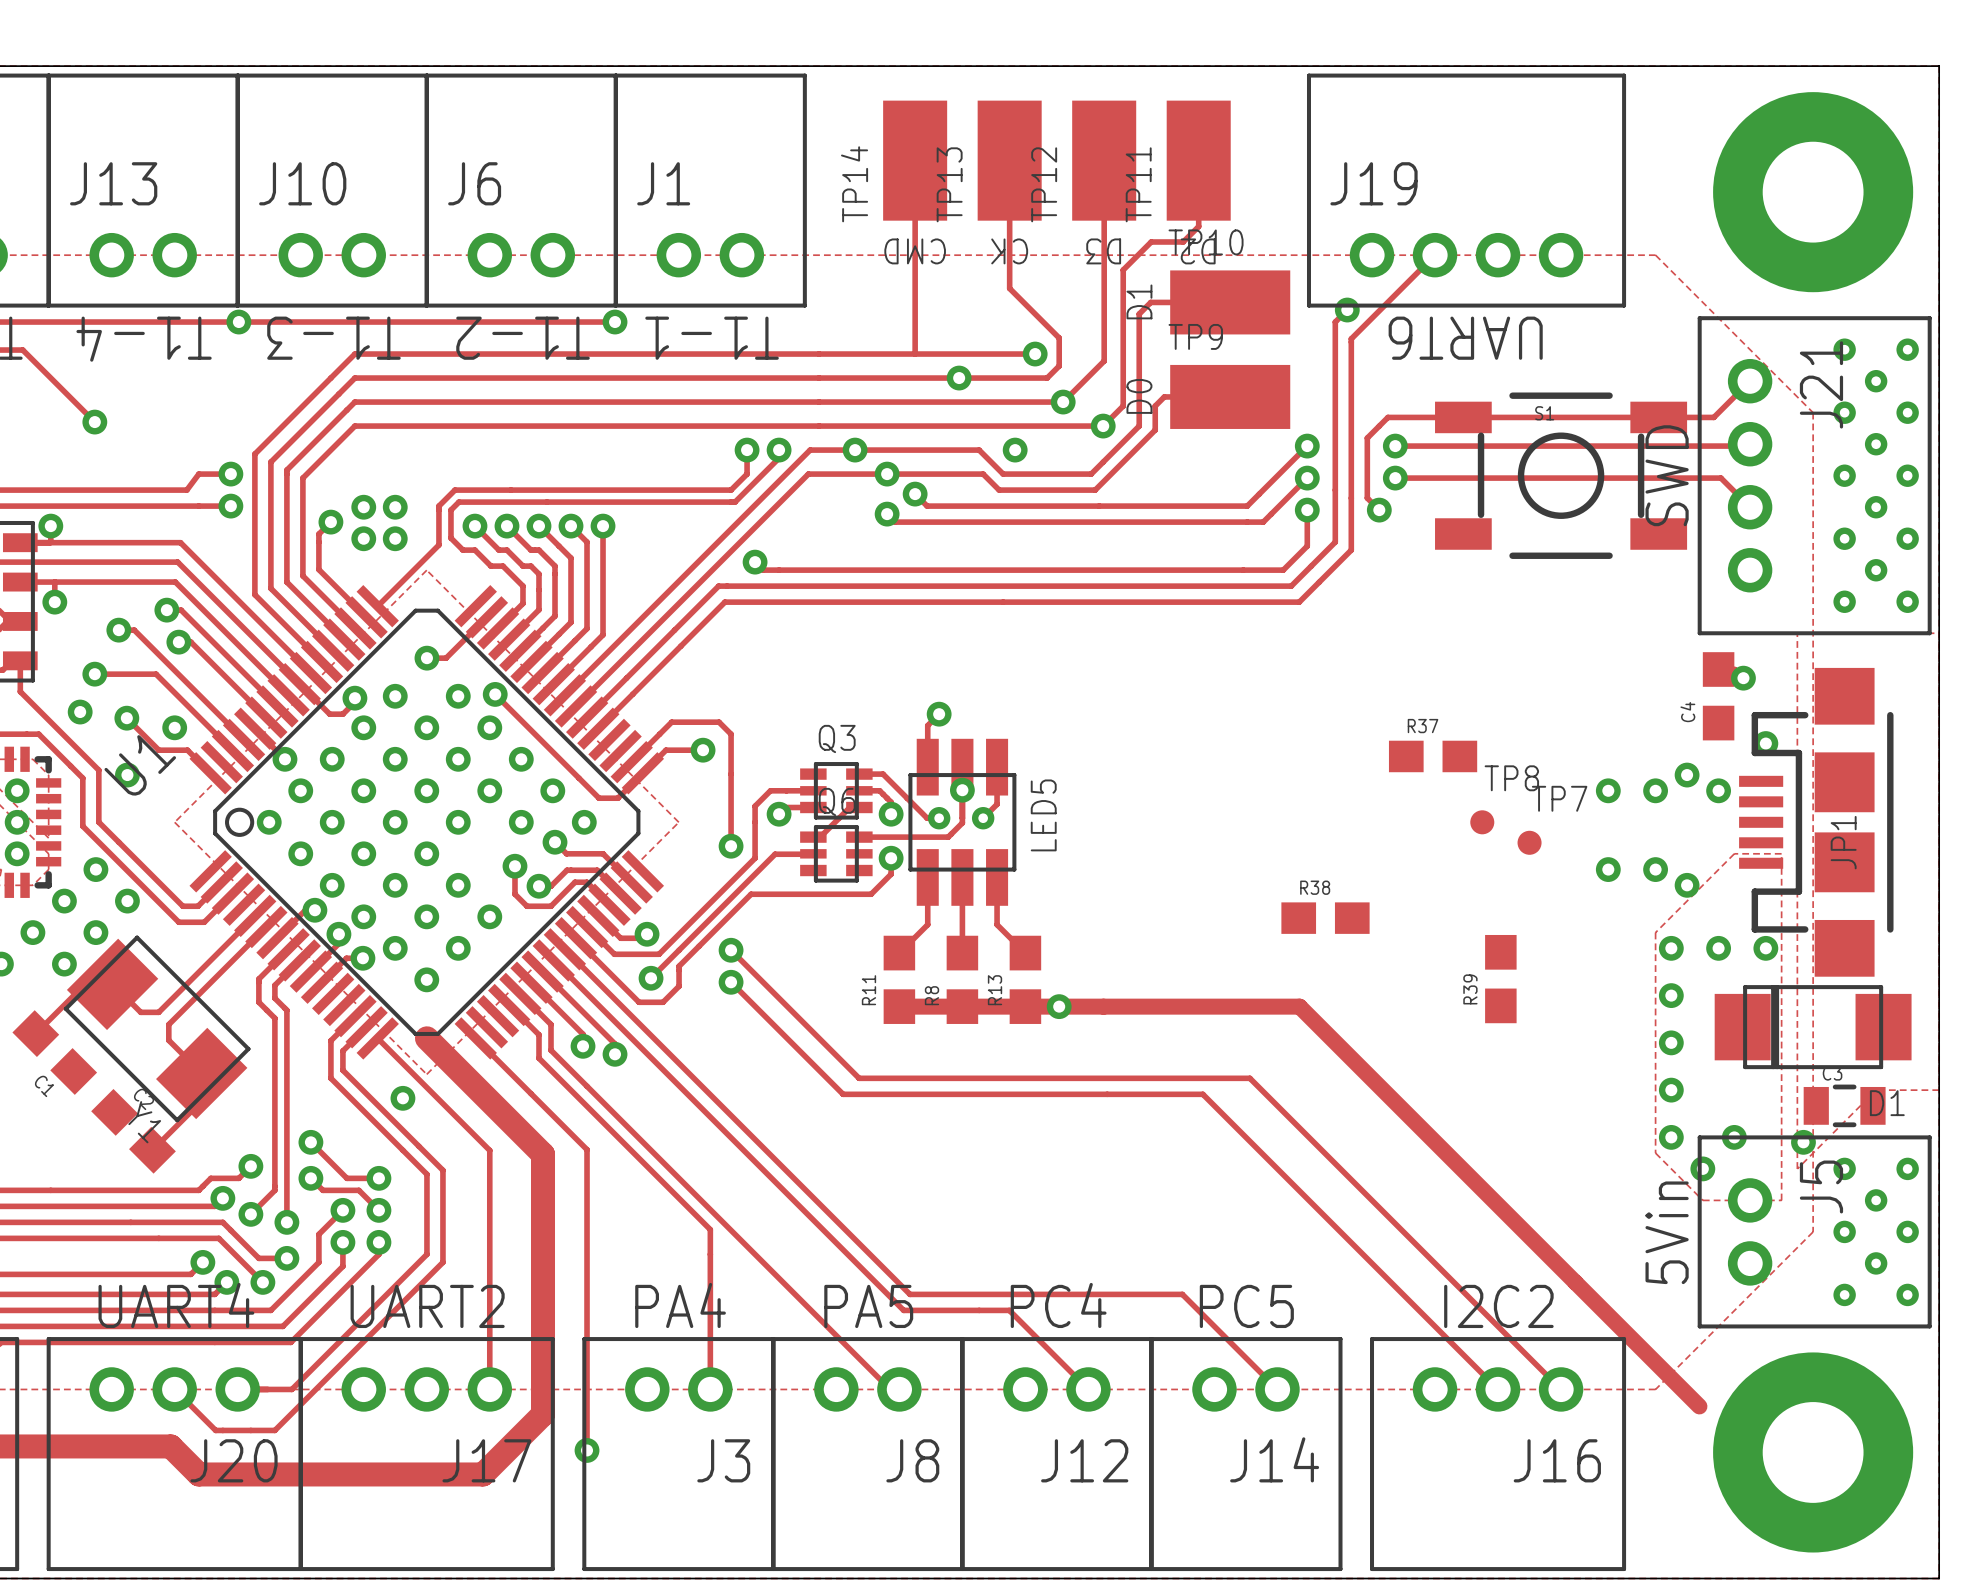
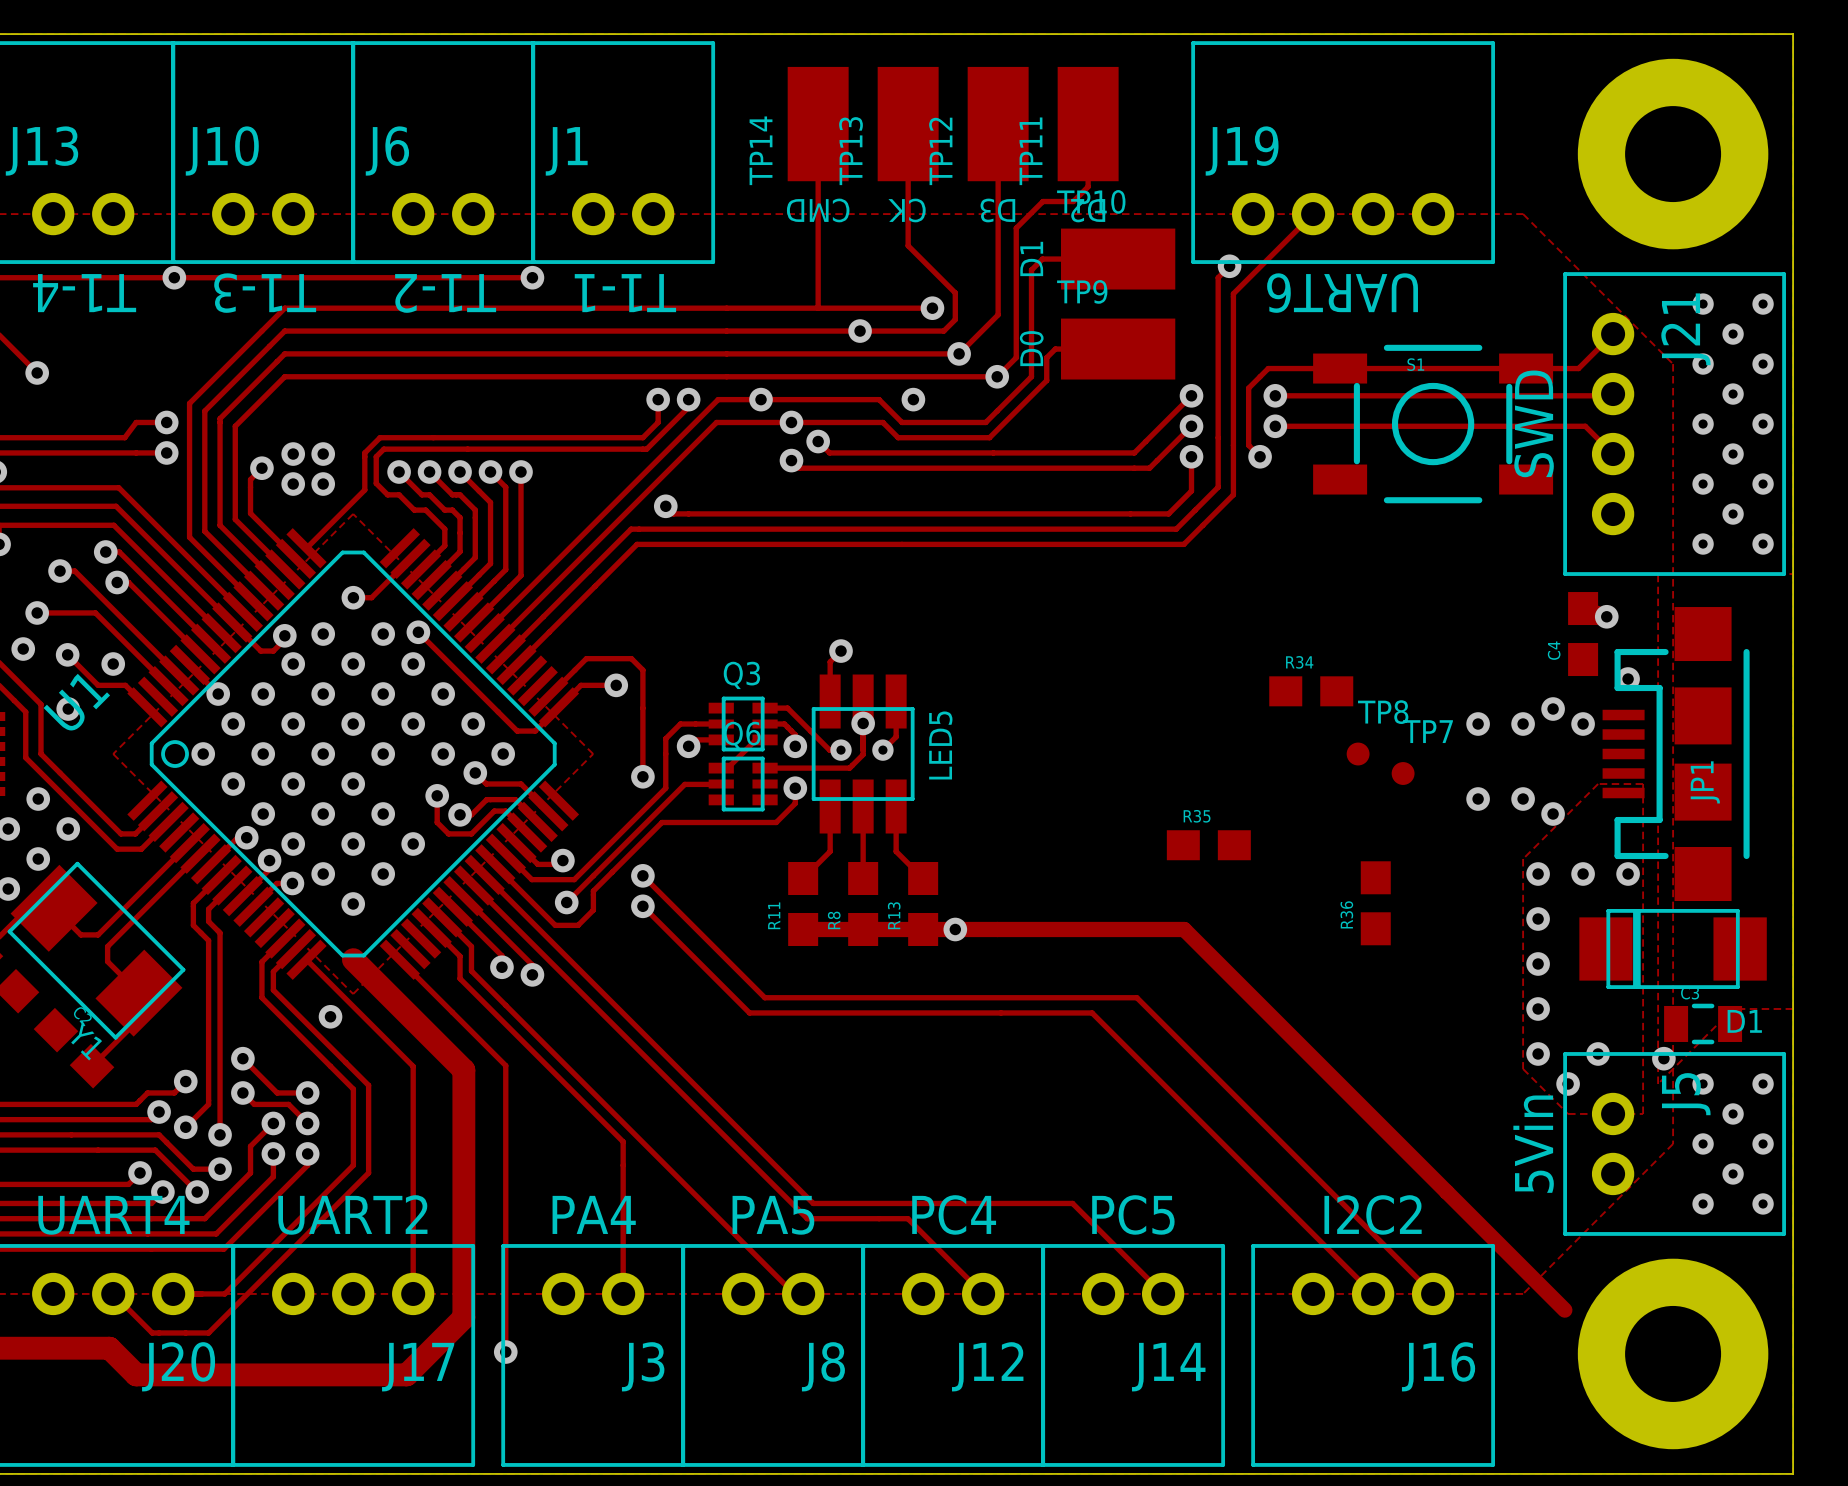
R37 name: R37 (1423, 726) -> R34 (1299, 662)
R38 name: R38 (1315, 887) -> R35 (1197, 816)
R39 name: R39 (1470, 989) -> R36 (1346, 914)

